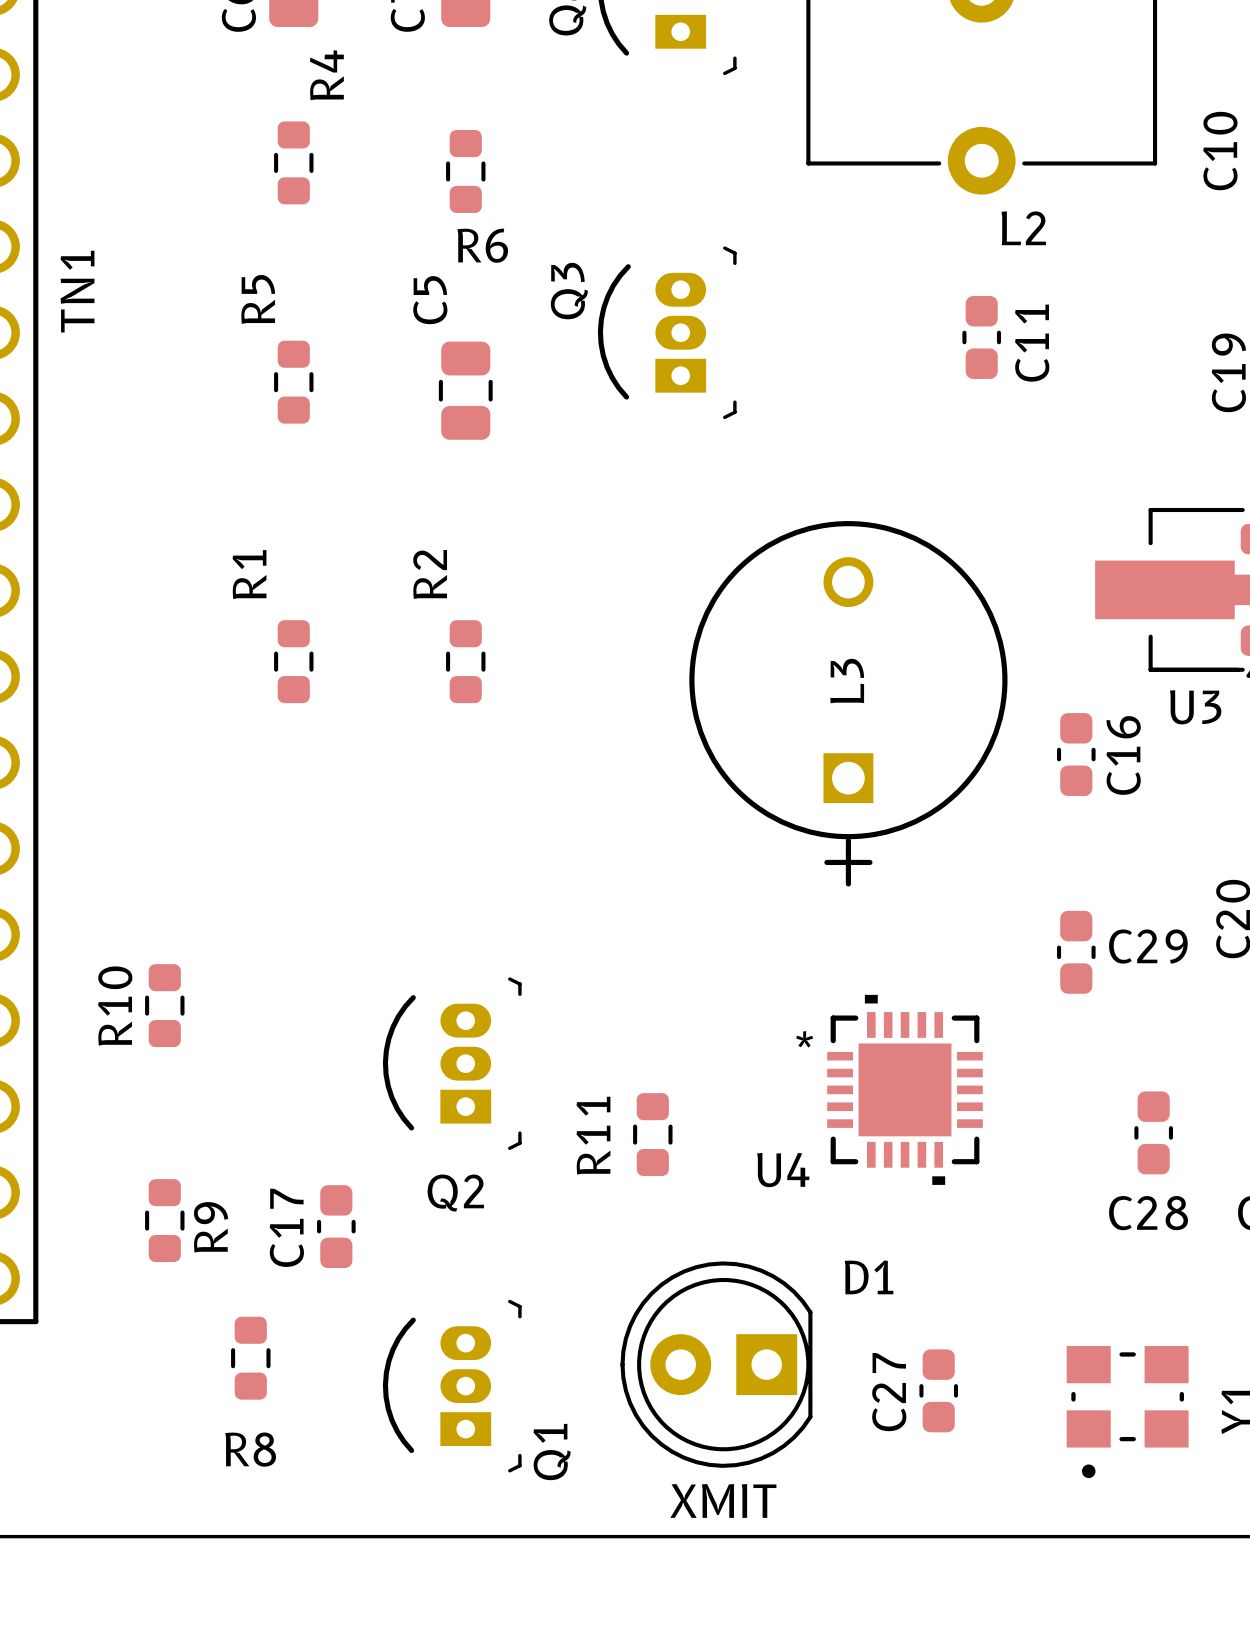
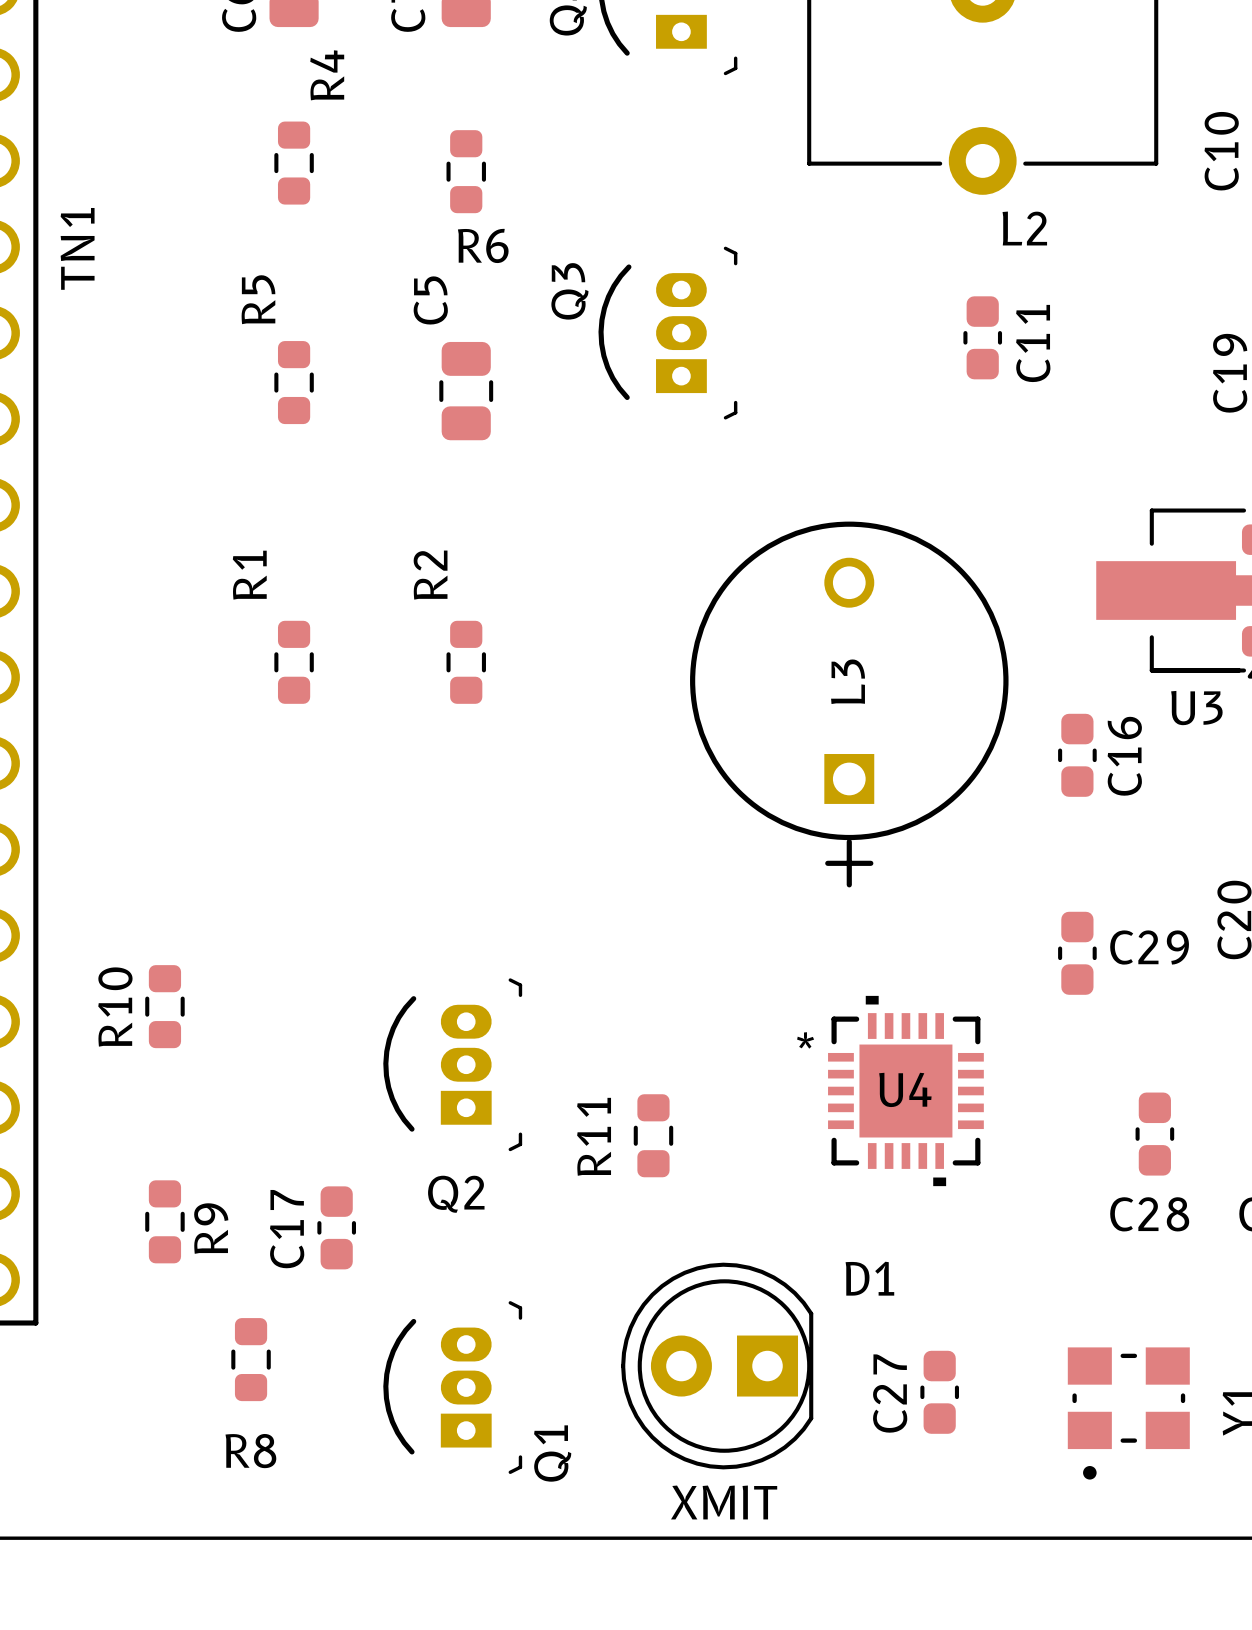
TN1 name position: TN1 (77, 291) -> TN1 (77, 248)
U4 name position: U4 (783, 1170) -> U4 (905, 1089)

